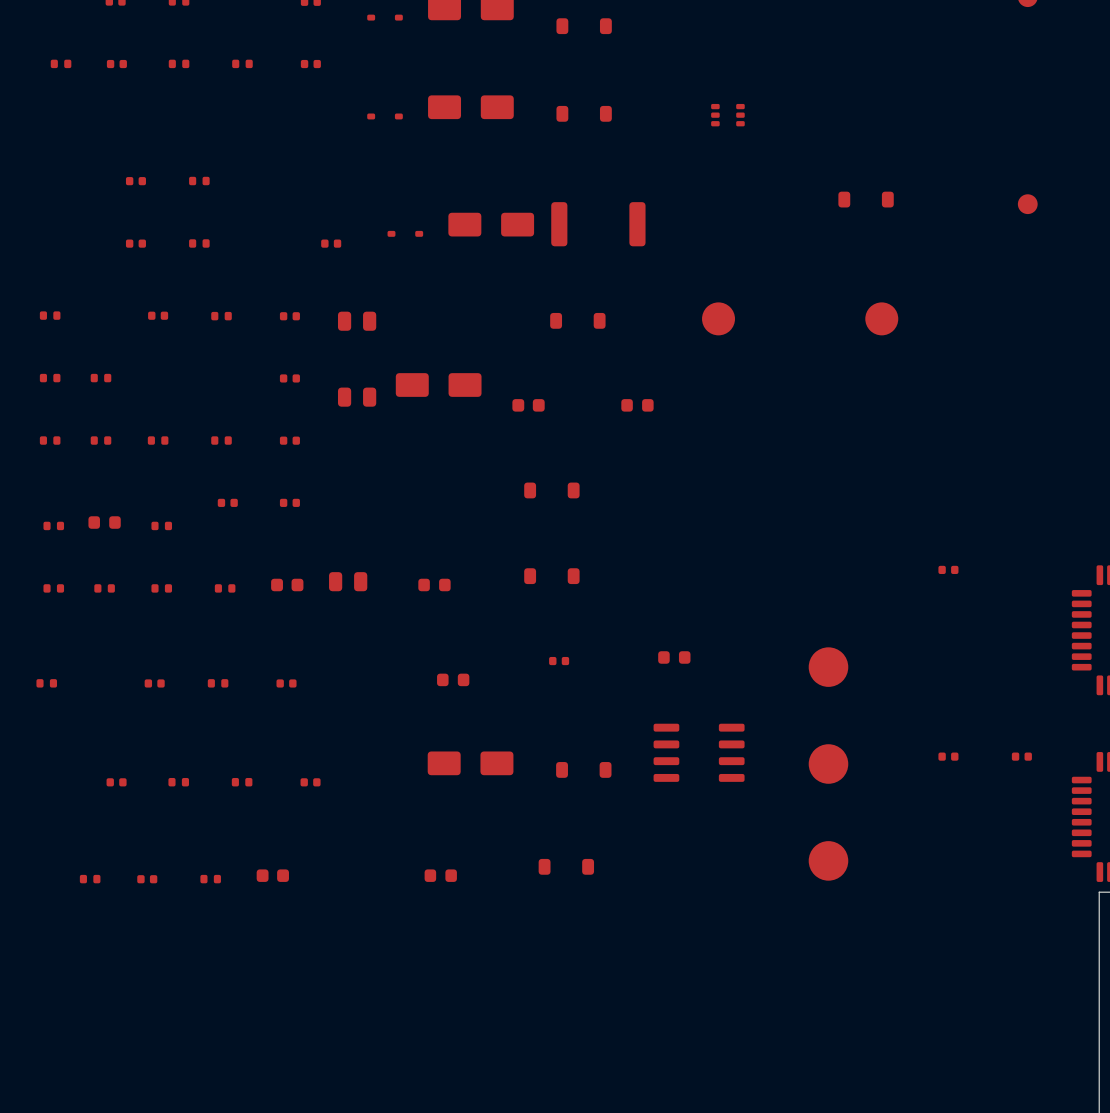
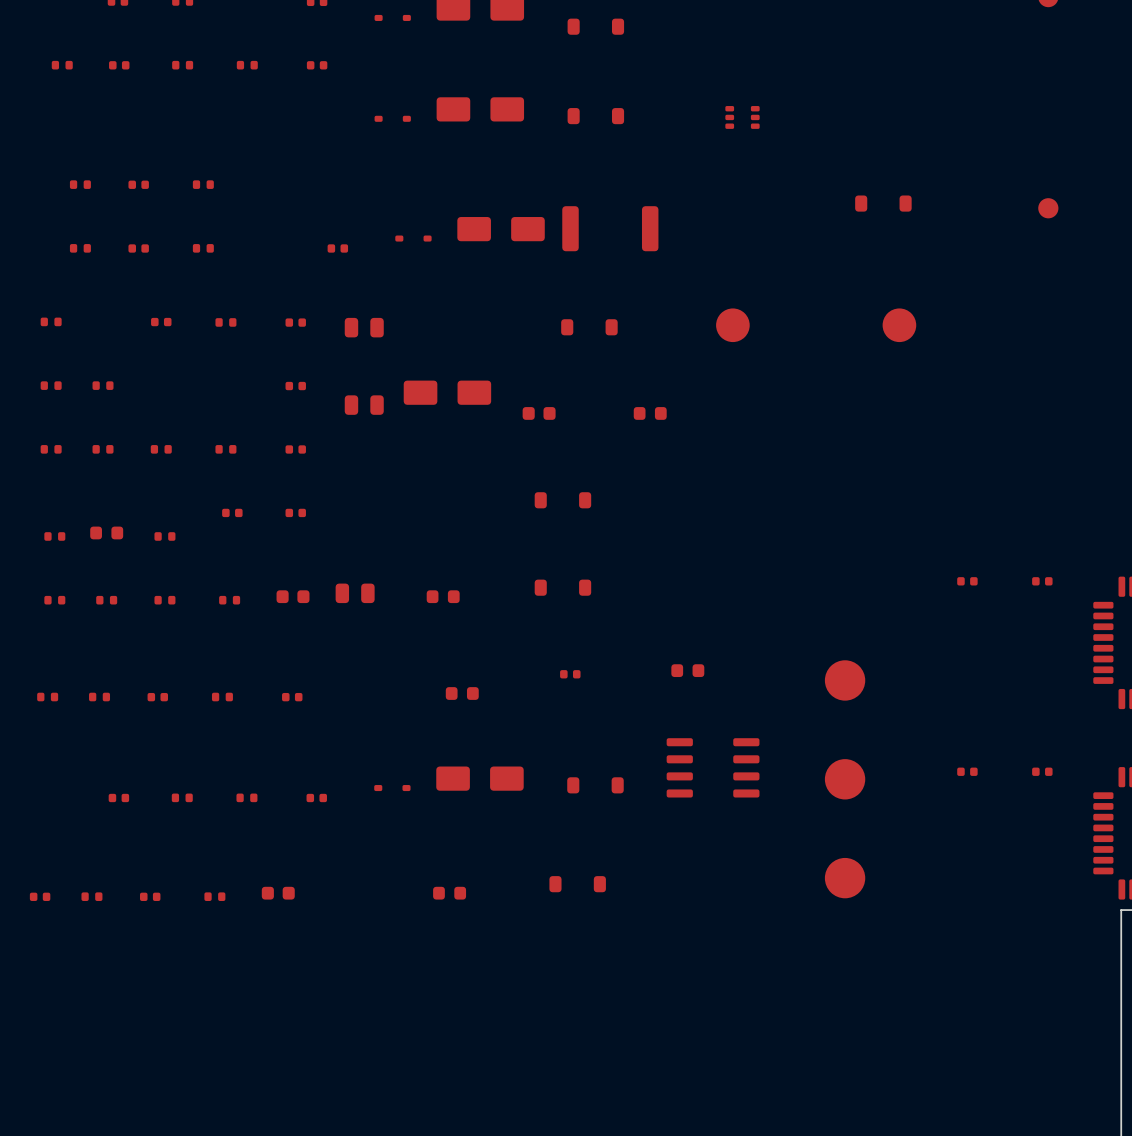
part: none -> (80, 184)
part: none -> (80, 248)
part: none -> (1042, 581)
part: none -> (99, 697)
part: none -> (392, 788)
part: none -> (40, 896)

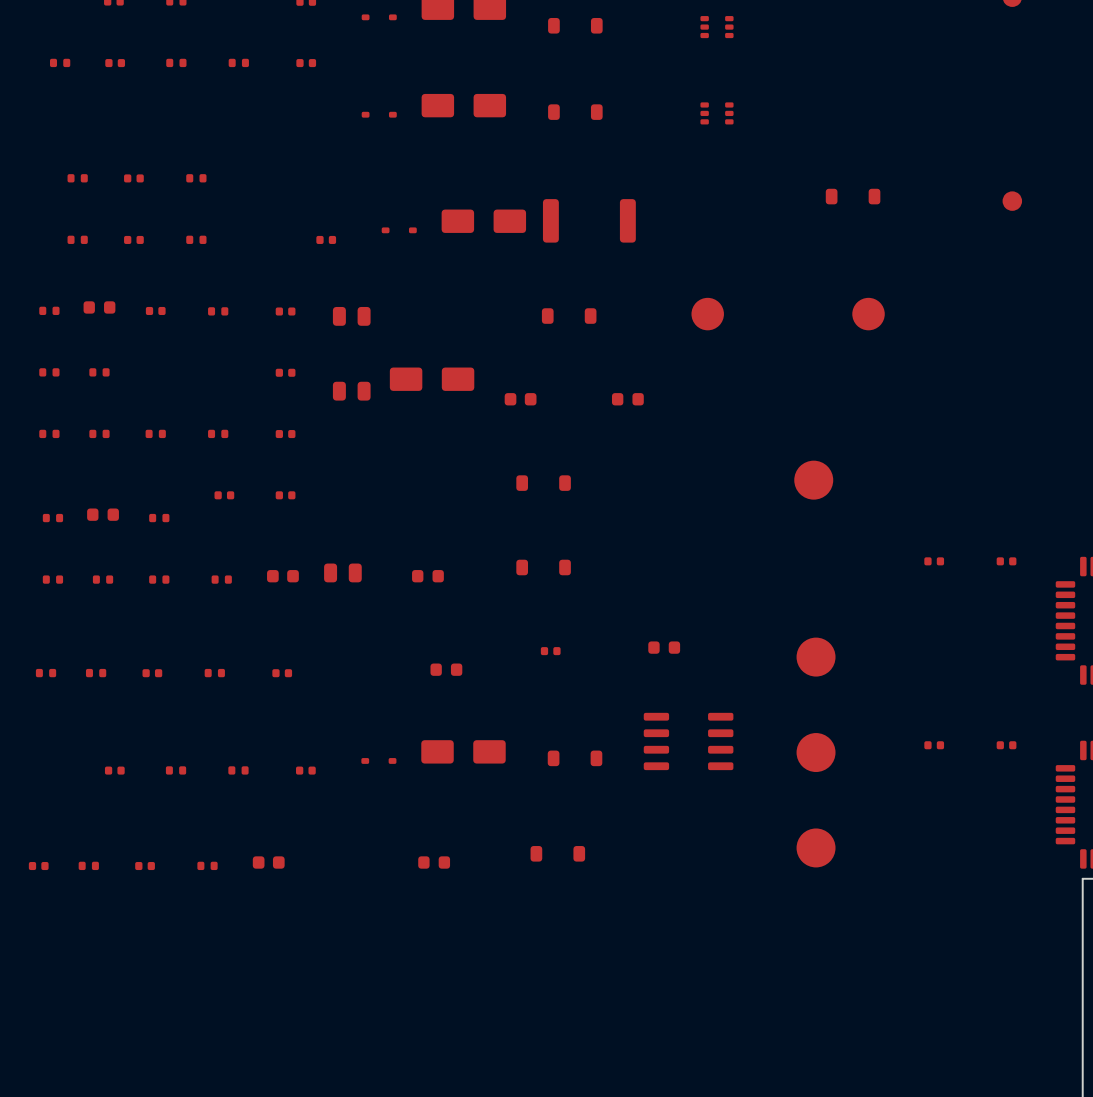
part: none -> (716, 27)
part: none -> (99, 307)
part: none -> (813, 480)

